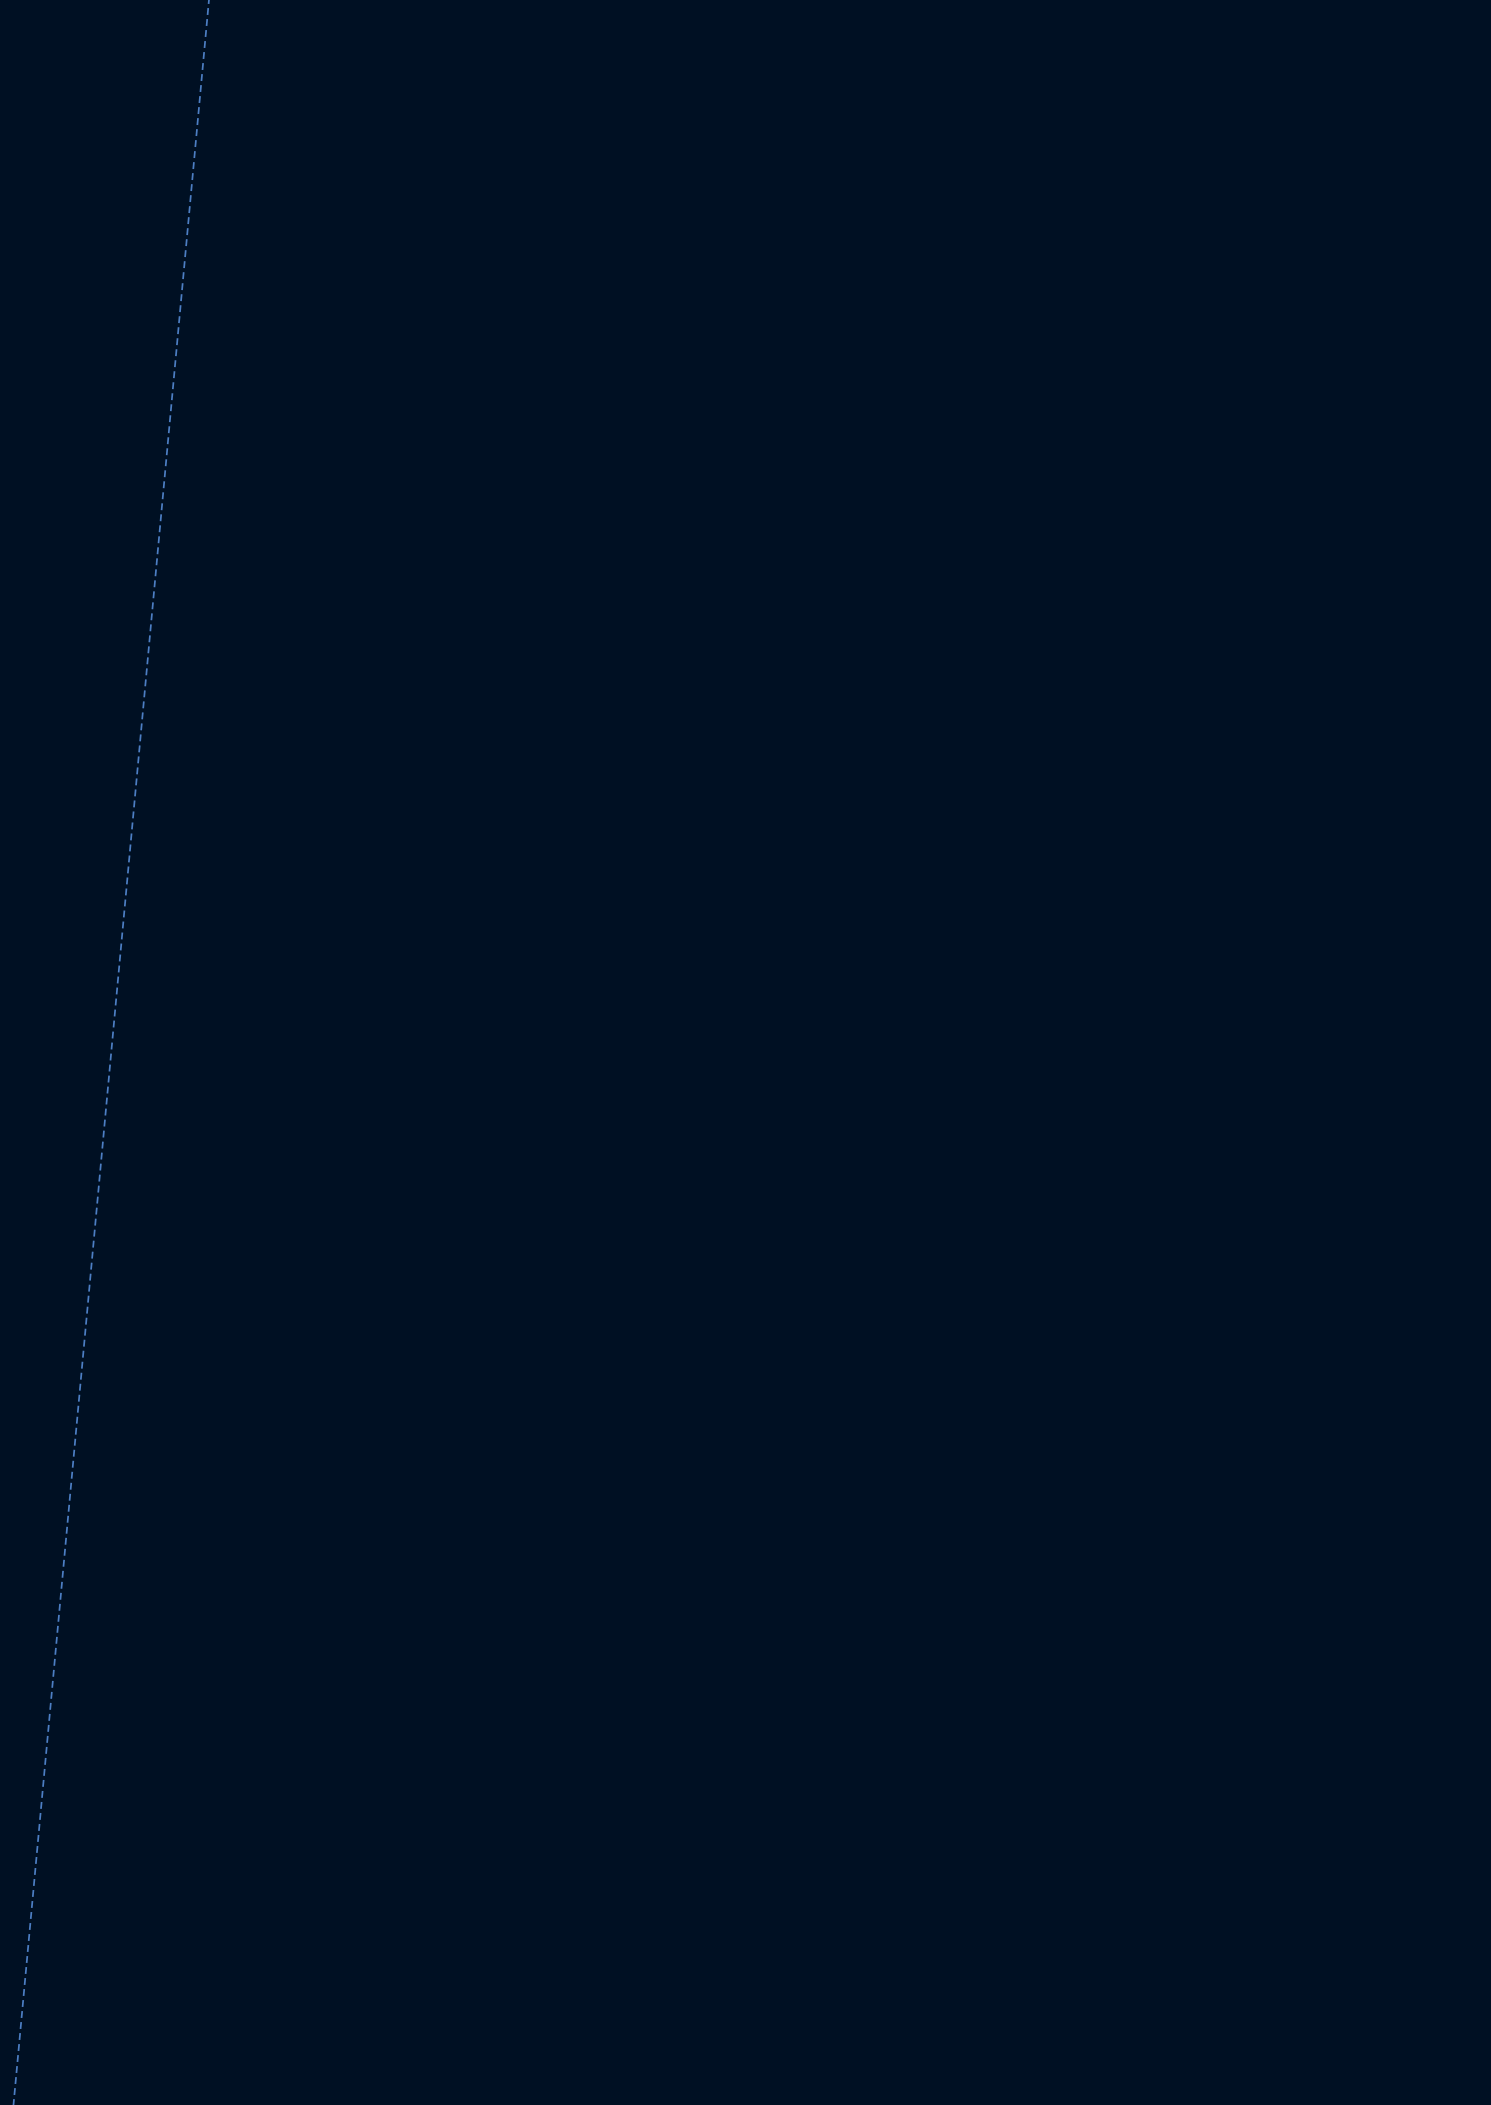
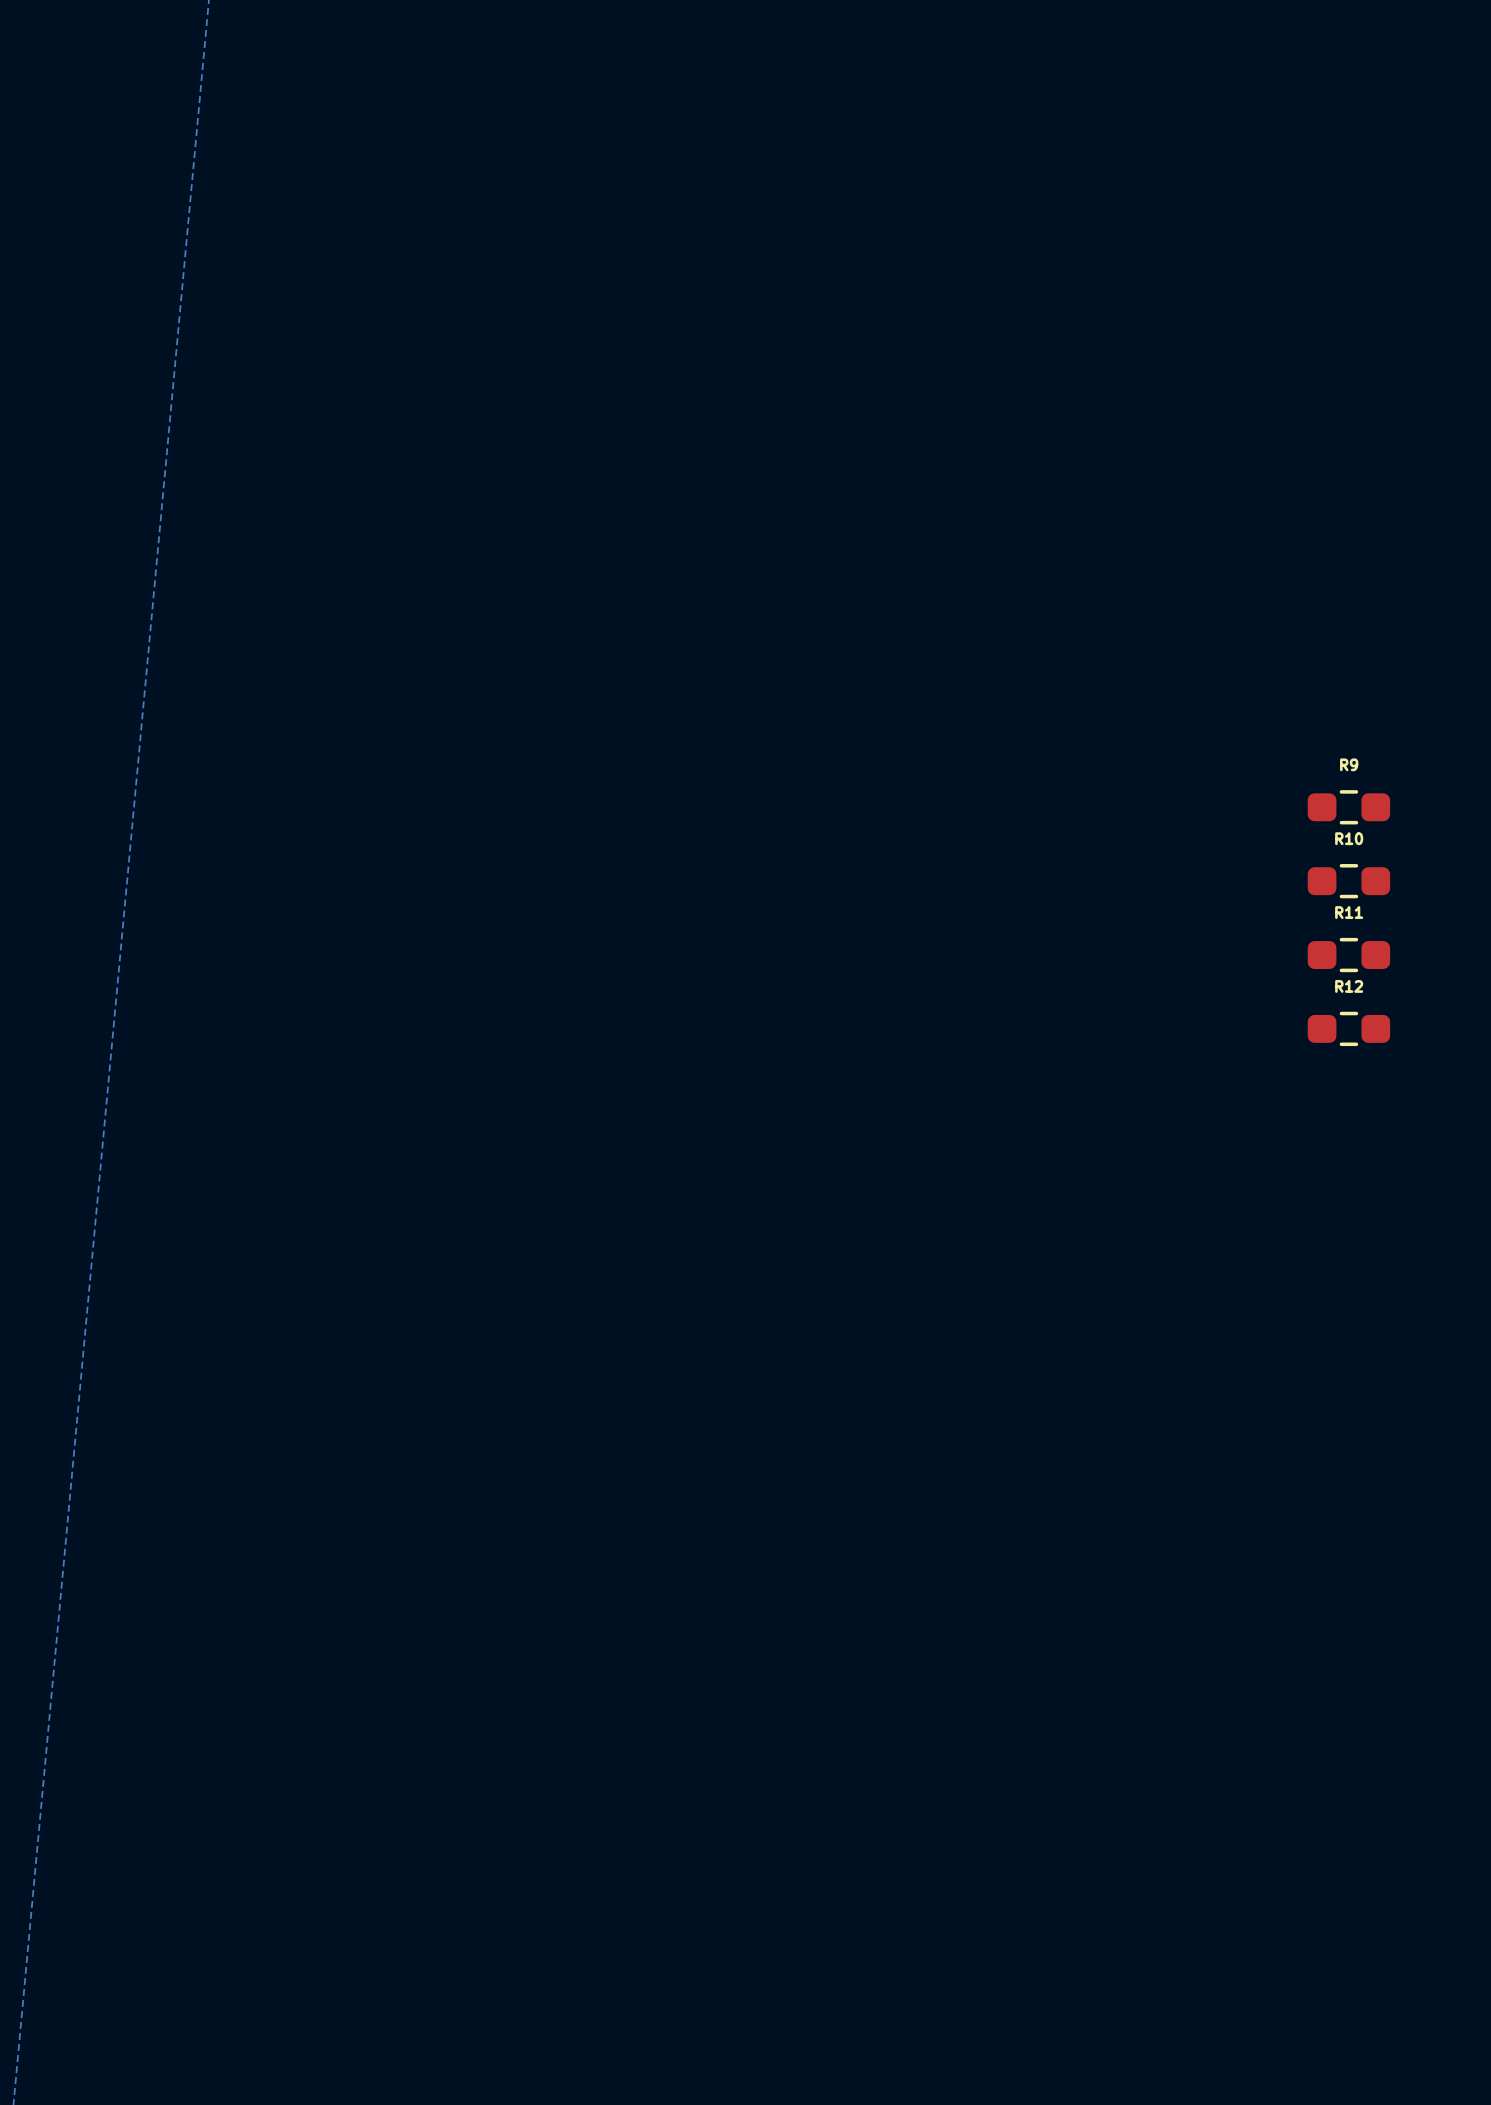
R9: none -> (1348, 807)
R10: none -> (1348, 881)
R11: none -> (1348, 955)
R12: none -> (1348, 1028)

